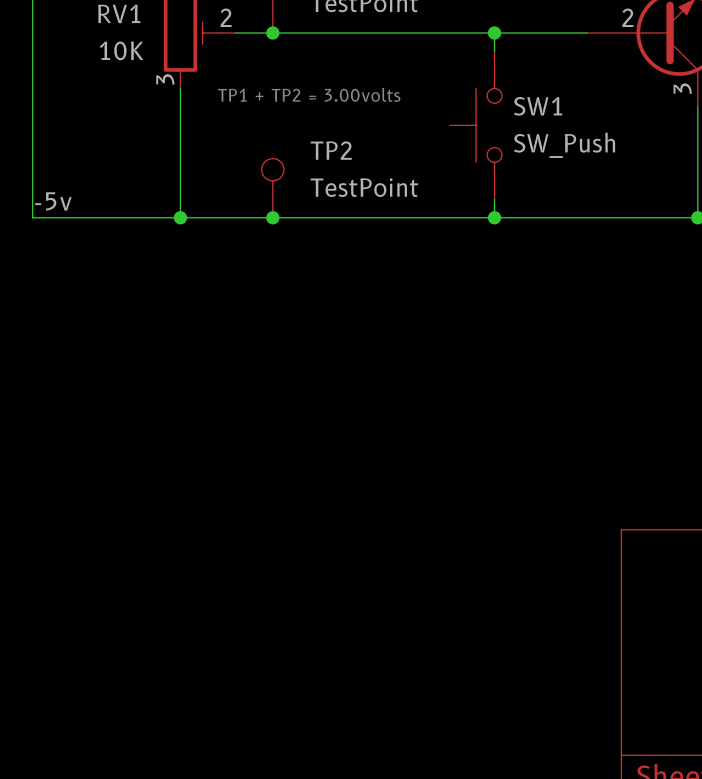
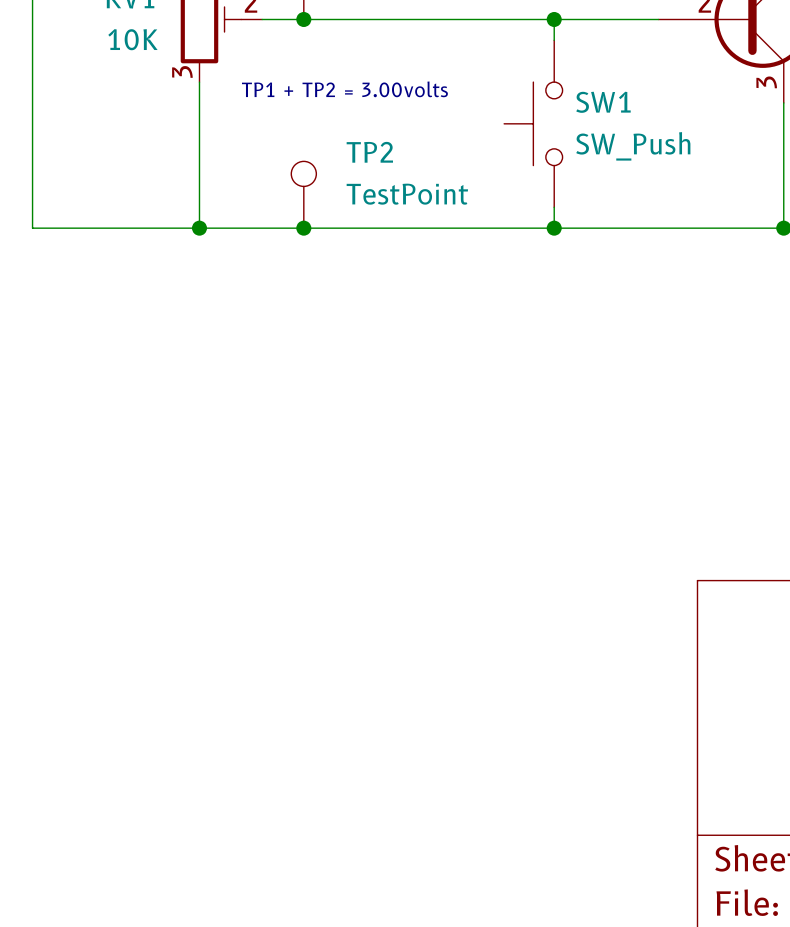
label: -5v (53, 201) -> none

